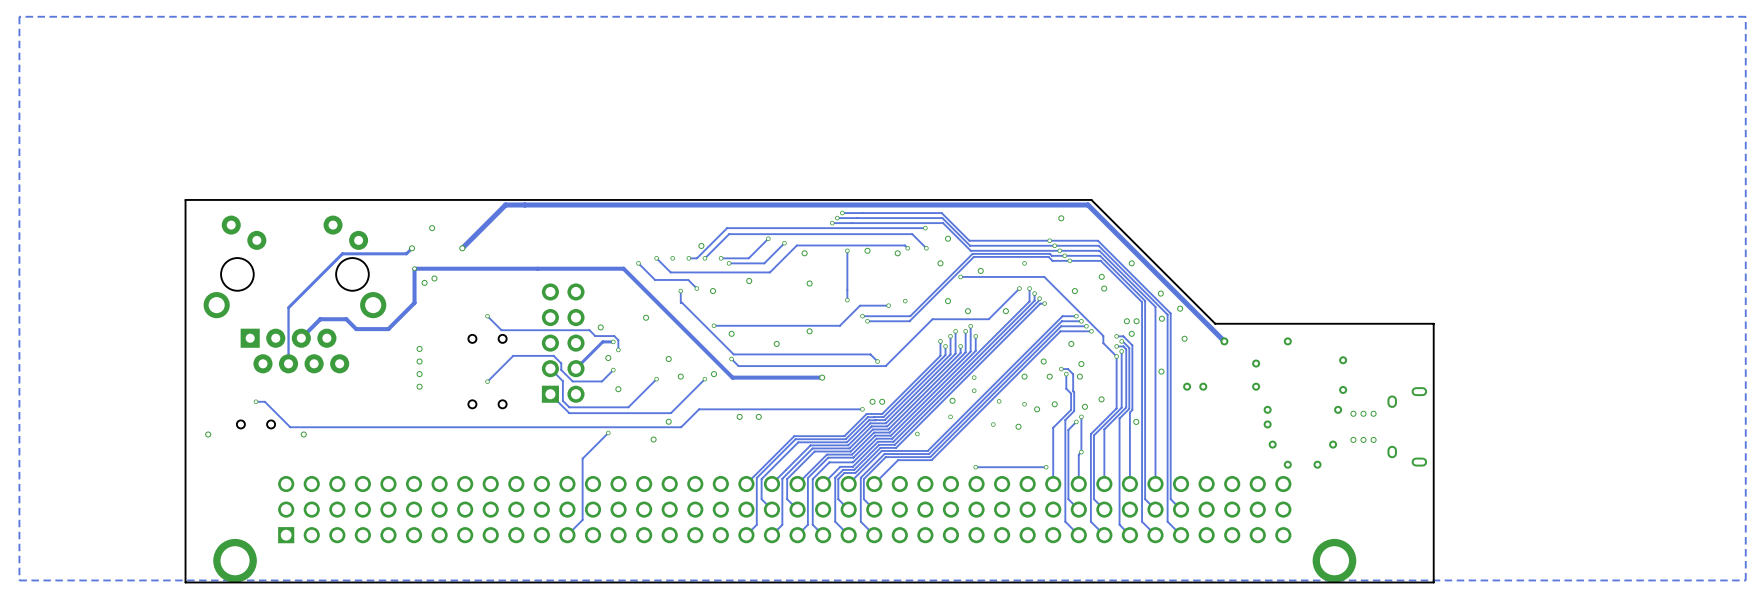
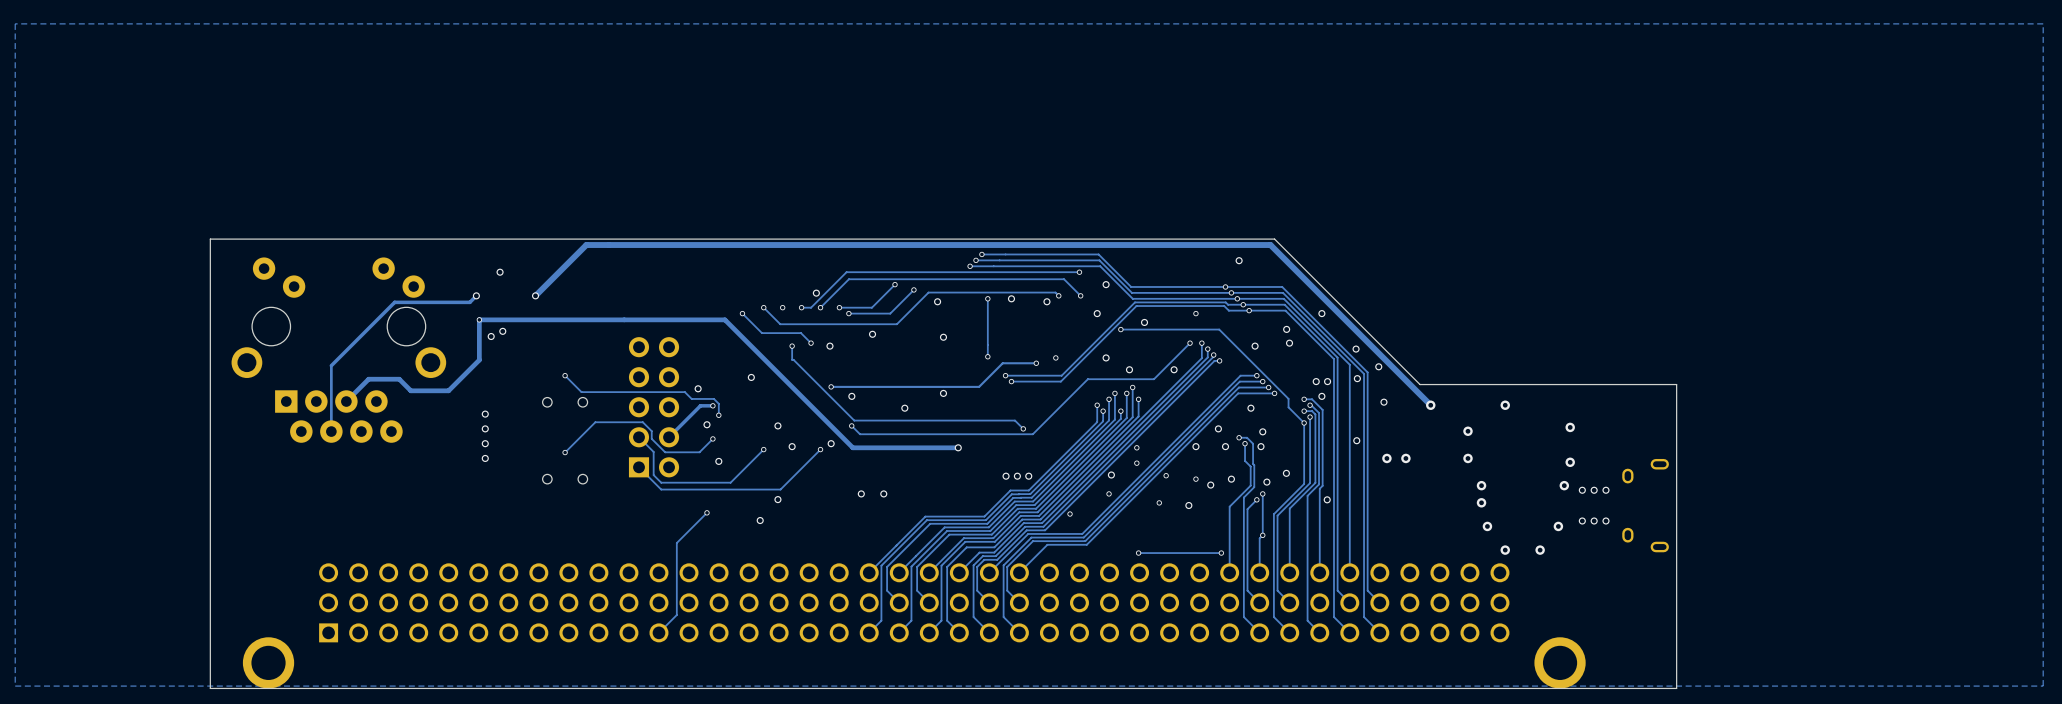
track: (255, 401) (264, 401) (290, 427) (681, 427) (699, 409) (862, 409) -> none
via: (255, 401) -> none
via: none -> (1006, 476)
via: (862, 409) -> none
part: (255, 424) -> none
via: (208, 434) -> none
via: (303, 434) -> none

